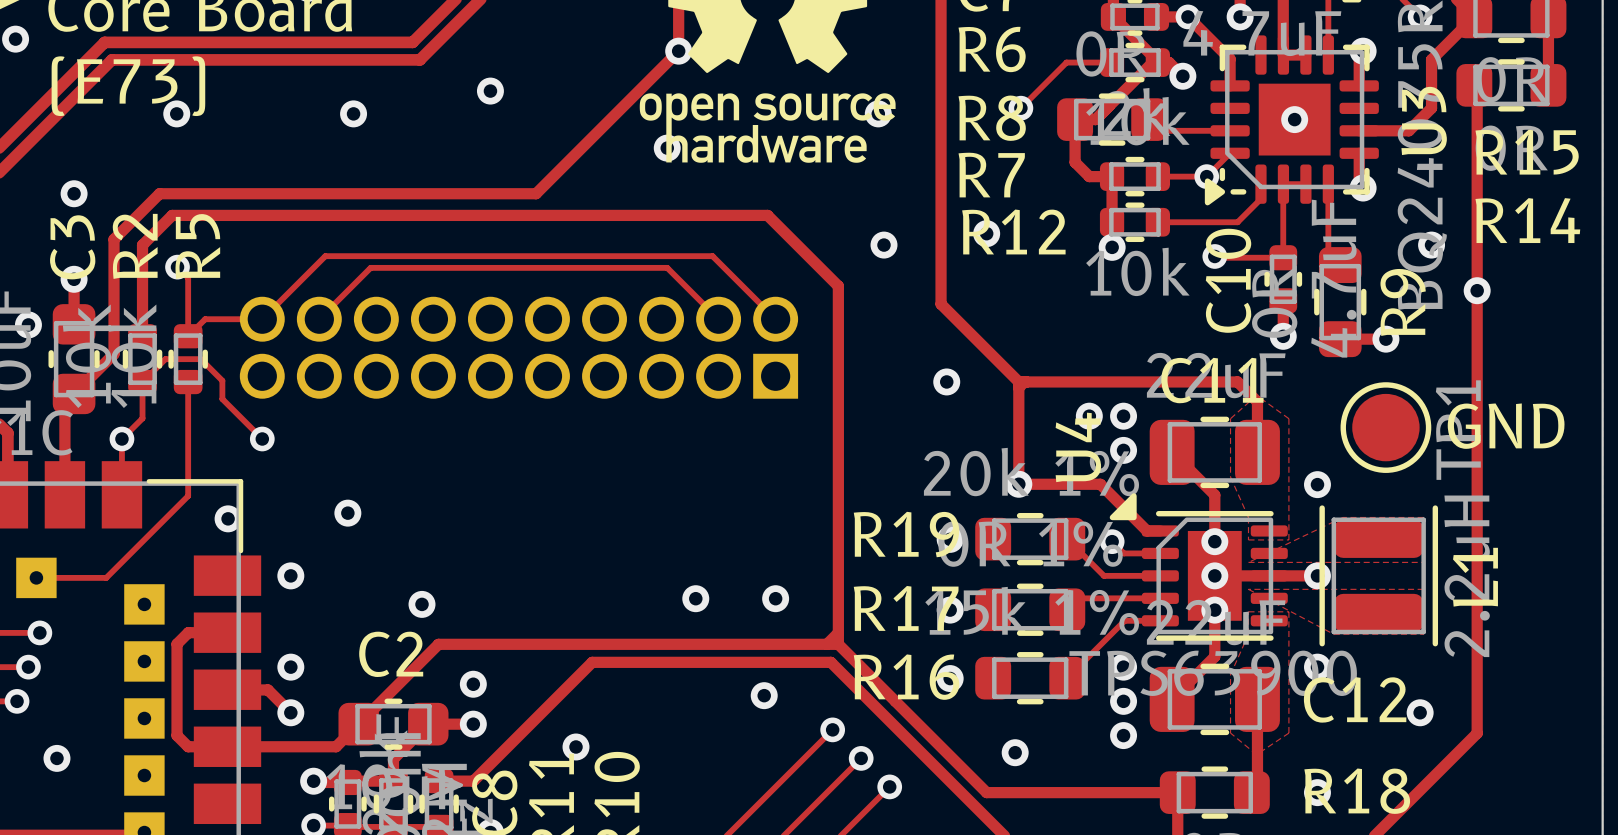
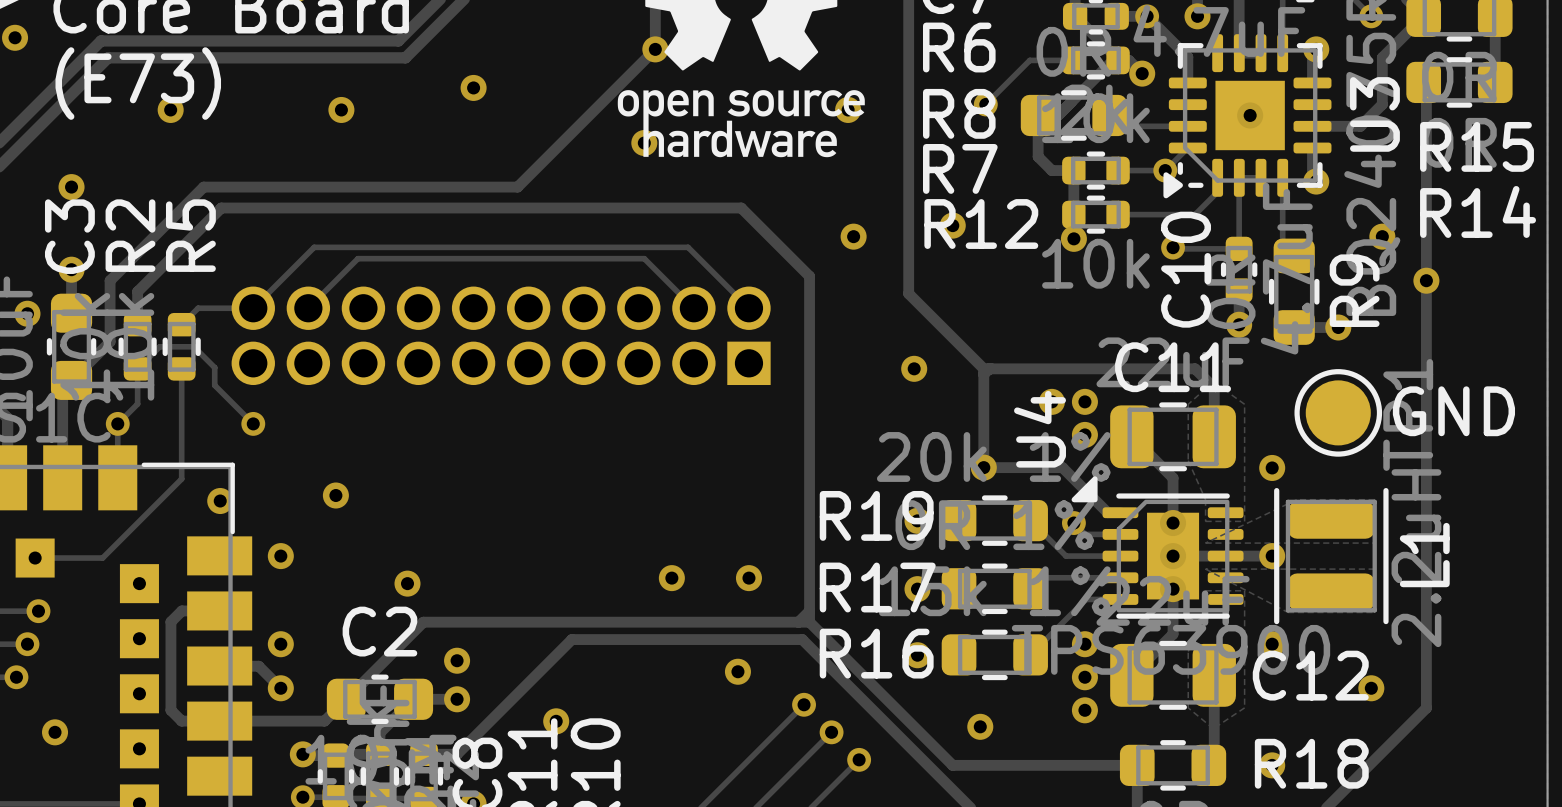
track: (210, 193) (159, 193) (114, 239) (114, 290) -> (203, 187) (110, 280)
track: (229, 215) (172, 215) (142, 245) (142, 302) -> (221, 208) (137, 291)
track: (177, 267) (188, 277) (188, 336) -> none
via: (177, 267) -> none

